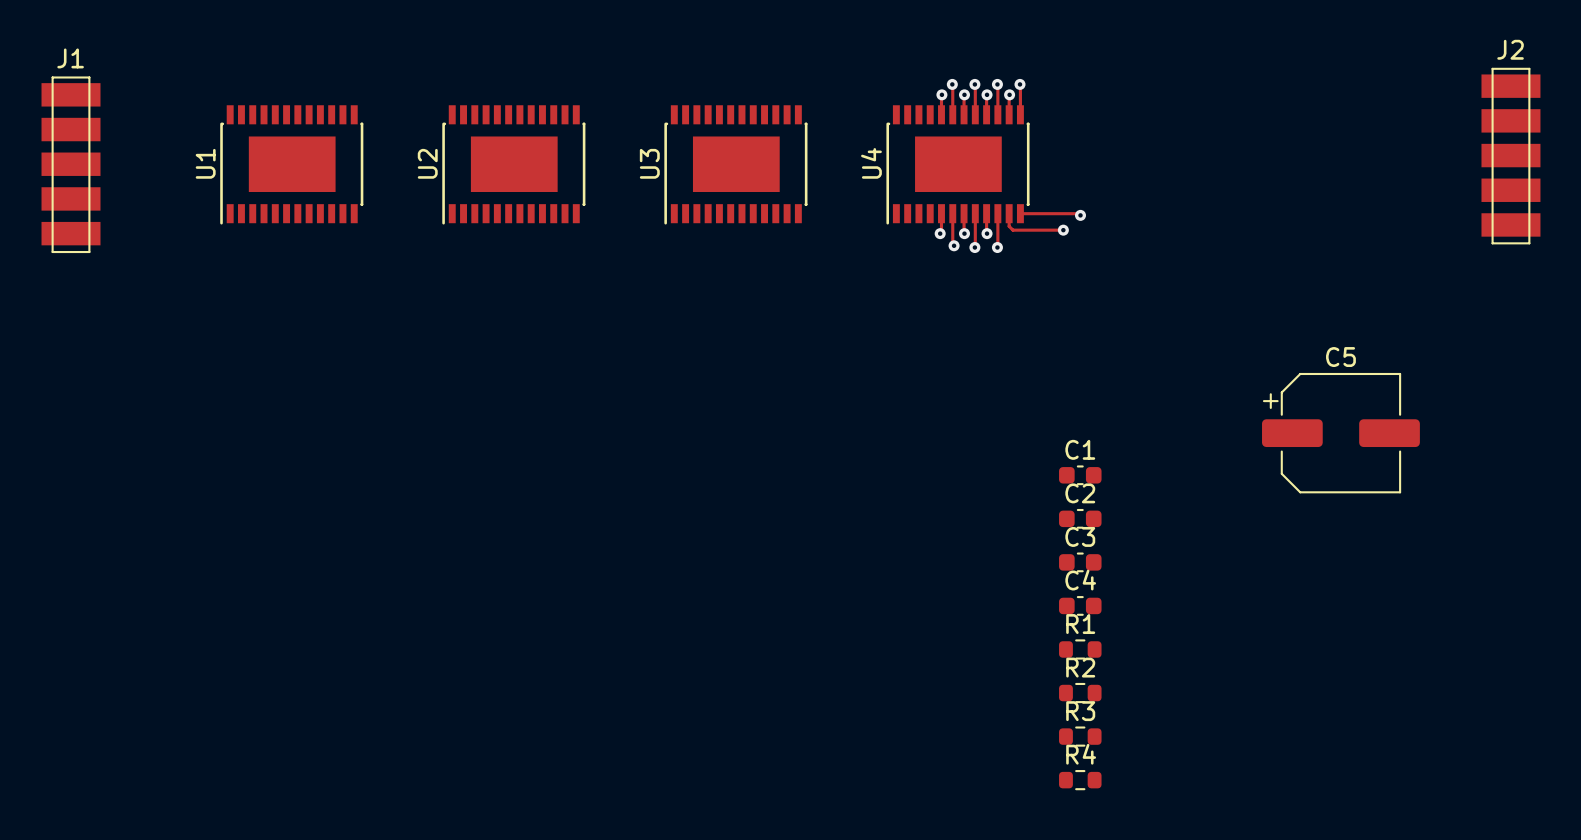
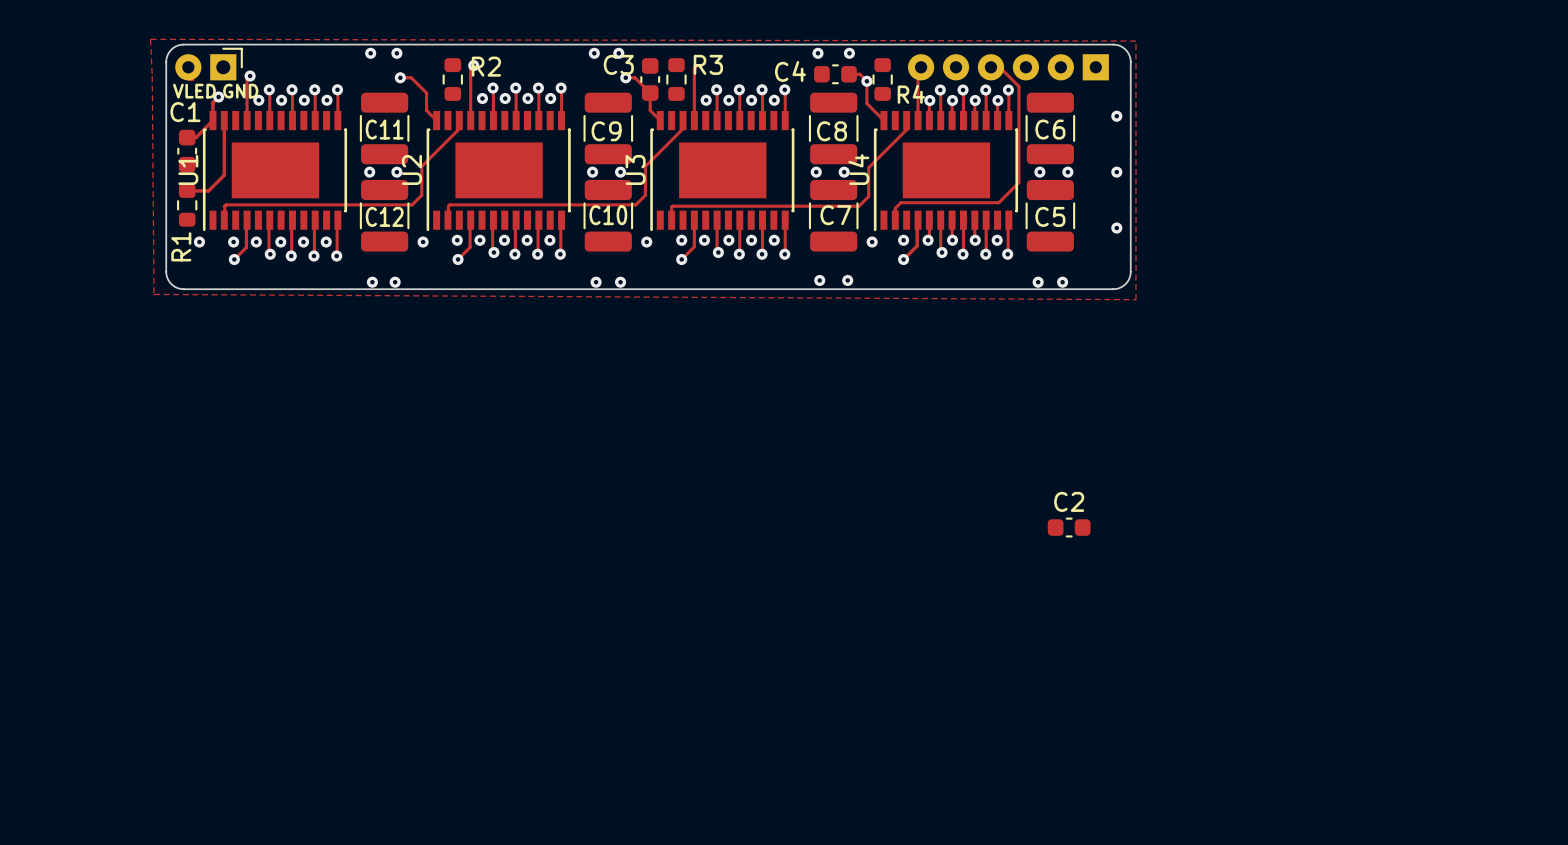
zone outline: none -> (150, 39) (1136, 41) (1136, 299) (154, 294) (150, 39)
board edge: none -> (183, 44) (1117, 45) (1125, 49) (1130, 60) (1130, 275) (1124, 285) (1113, 289) (179, 288) (171, 284) (166, 273) (166, 62) (171, 49) (183, 44)
via: none -> (370, 53)
via: none -> (396, 53)
via: none -> (594, 53)
via: none -> (618, 53)
via: none -> (817, 53)
via: none -> (849, 53)
part: none -> (209, 64)
track: none -> (473, 65) (470, 68) (470, 120)
via: none -> (473, 65)
track: none -> (697, 65) (694, 68) (694, 120)
track: none -> (914, 67) (918, 71) (918, 120) (919, 118)
track: none -> (990, 67) (999, 67) (1018, 86) (1018, 182) (998, 202) (900, 202) (895, 208) (895, 220)
part: none -> (1008, 67)
track: none -> (849, 74) (859, 74) (866, 81) (866, 103) (883, 120)
track: none -> (250, 76) (247, 79) (247, 120)
via: none -> (250, 76)
track: none -> (400, 77) (411, 77) (426, 93) (426, 110) (436, 120)
via: none -> (400, 77)
track: none -> (625, 77) (634, 77) (650, 93) (650, 110) (660, 120)
via: none -> (625, 77)
track: none -> (188, 79) (192, 79)
via: none -> (866, 81)
track: none -> (492, 88) (493, 118)
via: none -> (492, 88)
track: none -> (515, 88) (516, 118)
via: none -> (515, 88)
track: none -> (538, 88) (538, 118)
via: none -> (538, 88)
track: none -> (561, 88) (561, 118)
via: none -> (561, 88)
track: none -> (269, 89) (269, 120)
via: none -> (269, 89)
track: none -> (292, 89) (292, 120)
via: none -> (292, 89)
track: none -> (314, 89) (315, 120)
via: none -> (314, 89)
track: none -> (337, 89) (337, 120)
via: none -> (337, 89)
track: none -> (716, 89) (717, 120)
via: none -> (716, 89)
track: none -> (739, 89) (739, 120)
via: none -> (739, 89)
track: none -> (762, 89) (762, 120)
via: none -> (762, 89)
track: none -> (784, 89) (785, 120)
via: none -> (784, 89)
text: none -> VLED (194, 91)
text: none -> GND (240, 91)
track: none -> (218, 96) (212, 102) (212, 120) (195, 137) (187, 137)
via: none -> (218, 96)
via: none -> (482, 98)
via: none -> (505, 98)
via: none -> (527, 98)
via: none -> (550, 98)
via: none -> (258, 100)
via: none -> (281, 100)
via: none -> (304, 100)
via: none -> (326, 100)
via: none -> (706, 100)
via: none -> (728, 100)
via: none -> (751, 100)
via: none -> (774, 100)
via: none -> (1116, 116)
track: none -> (459, 119) (459, 128) (421, 166) (421, 195) (412, 204) (225, 204) (224, 218)
track: none -> (683, 119) (683, 128) (645, 166) (645, 195) (635, 204) (449, 204) (448, 218)
track: none -> (224, 120) (224, 175) (208, 190) (187, 190)
track: none -> (906, 120) (906, 129) (868, 167) (868, 196) (859, 206) (672, 206) (671, 220)
C11: none -> (384, 128)
C9: none -> (608, 128)
C8: none -> (833, 128)
C6: none -> (1050, 128)
J2: (1510, 156) -> none
J1: (71, 164) -> none
via: none -> (369, 172)
via: none -> (396, 172)
via: none -> (592, 172)
via: none -> (620, 172)
via: none -> (816, 172)
via: none -> (844, 172)
via: none -> (1039, 172)
via: none -> (1067, 172)
via: none -> (1116, 172)
C12: none -> (384, 215)
C10: none -> (608, 215)
C7: none -> (833, 215)
track: none -> (247, 220) (246, 247) (234, 259)
track: none -> (470, 220) (470, 247) (458, 259)
track: none -> (492, 220) (493, 252)
track: none -> (515, 220) (514, 254)
track: none -> (538, 220) (537, 254)
track: none -> (560, 220) (560, 254)
track: none -> (694, 220) (694, 246) (681, 259)
track: none -> (717, 220) (718, 252)
track: none -> (739, 220) (739, 254)
track: none -> (762, 220) (762, 254)
track: none -> (785, 220) (784, 254)
track: none -> (918, 220) (917, 245) (903, 259)
track: (1009, 213) (1009, 226) (1012, 230) (1063, 230) -> none
track: none -> (1008, 220) (1007, 254)
track: (1020, 213) (1078, 213) (1080, 215) -> none
track: none -> (269, 221) (270, 254)
track: none -> (291, 221) (291, 256)
track: none -> (314, 221) (313, 256)
track: none -> (337, 221) (336, 256)
via: (1080, 215) -> none
via: none -> (1116, 228)
via: (1063, 230) -> none
via: none -> (457, 240)
via: none -> (479, 240)
via: none -> (504, 240)
via: none -> (527, 240)
via: none -> (549, 240)
via: none -> (681, 240)
via: none -> (704, 240)
via: none -> (728, 240)
via: none -> (751, 240)
via: none -> (774, 240)
via: none -> (903, 240)
via: none -> (997, 240)
via: none -> (199, 242)
via: none -> (233, 242)
via: none -> (256, 242)
via: none -> (280, 242)
via: none -> (303, 242)
via: none -> (326, 242)
via: none -> (423, 242)
via: none -> (646, 242)
via: none -> (872, 242)
via: none -> (493, 252)
via: none -> (718, 252)
via: none -> (270, 254)
via: none -> (514, 254)
via: none -> (537, 254)
via: none -> (560, 254)
via: none -> (739, 254)
via: none -> (762, 254)
via: none -> (784, 254)
via: none -> (1007, 254)
via: none -> (291, 256)
via: none -> (313, 256)
via: none -> (336, 256)
via: none -> (234, 259)
via: none -> (458, 259)
via: none -> (681, 259)
via: none -> (903, 259)
via: none -> (819, 280)
via: none -> (847, 280)
via: none -> (372, 282)
via: none -> (395, 282)
via: none -> (596, 282)
via: none -> (620, 282)
via: none -> (1038, 282)
via: none -> (1062, 282)
C5 name position: C5 (1340, 357) -> C5 (1050, 216)
C5 footprint: [1262, 372, 1420, 494] -> [1025, 179, 1076, 252]
C1 rotation: 0° (1080, 475) -> 90° clockwise (187, 151)
C1 position: (1080, 475) -> (187, 151)
C3 rotation: 0° (1080, 562) -> 90° clockwise (650, 79)
C3 position: (1080, 562) -> (650, 79)
C4 name position: C4 (1080, 580) -> C4 (790, 71)
C4 position: (1080, 605) -> (835, 74)
R1 name position: R1 (1080, 624) -> R1 (181, 246)
R1 rotation: 0° (1080, 649) -> 90° clockwise (187, 205)
R1 position: (1080, 649) -> (187, 205)
R2 rotation: 0° (1080, 693) -> 90° clockwise (452, 79)
R2 position: (1080, 693) -> (452, 79)
R3 rotation: 0° (1080, 736) -> 90° clockwise (676, 79)
R3 position: (1080, 736) -> (676, 79)
R4 rotation: 0° (1080, 780) -> 90° clockwise (882, 79)
R4 position: (1080, 780) -> (882, 79)

